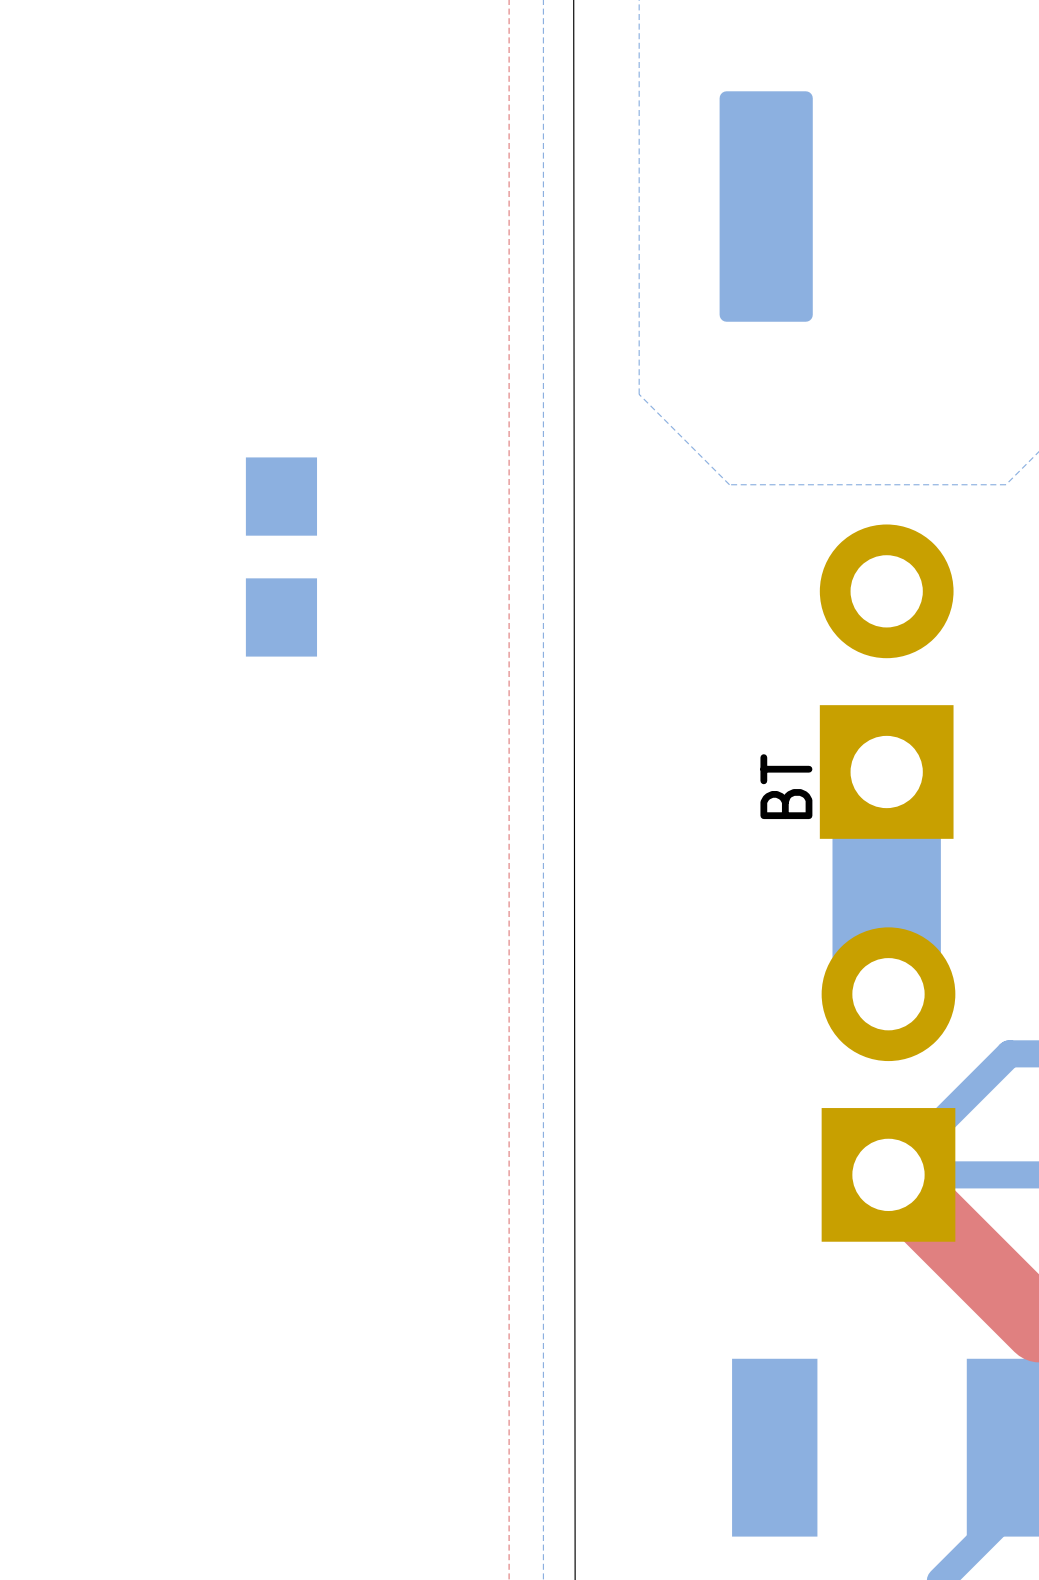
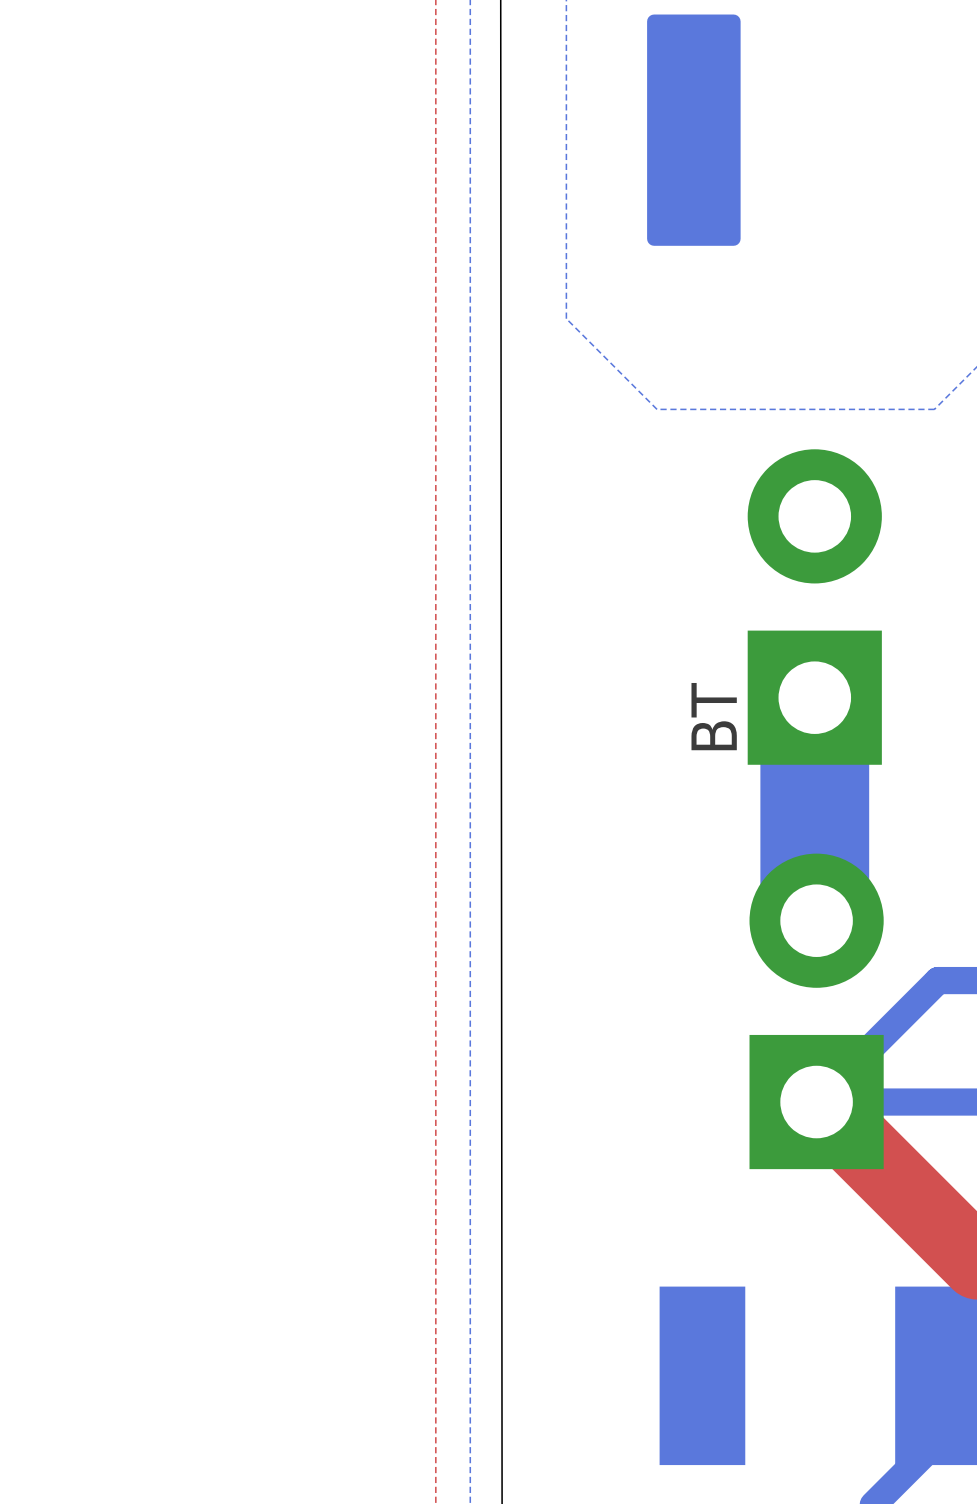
part: (281, 557) -> none

